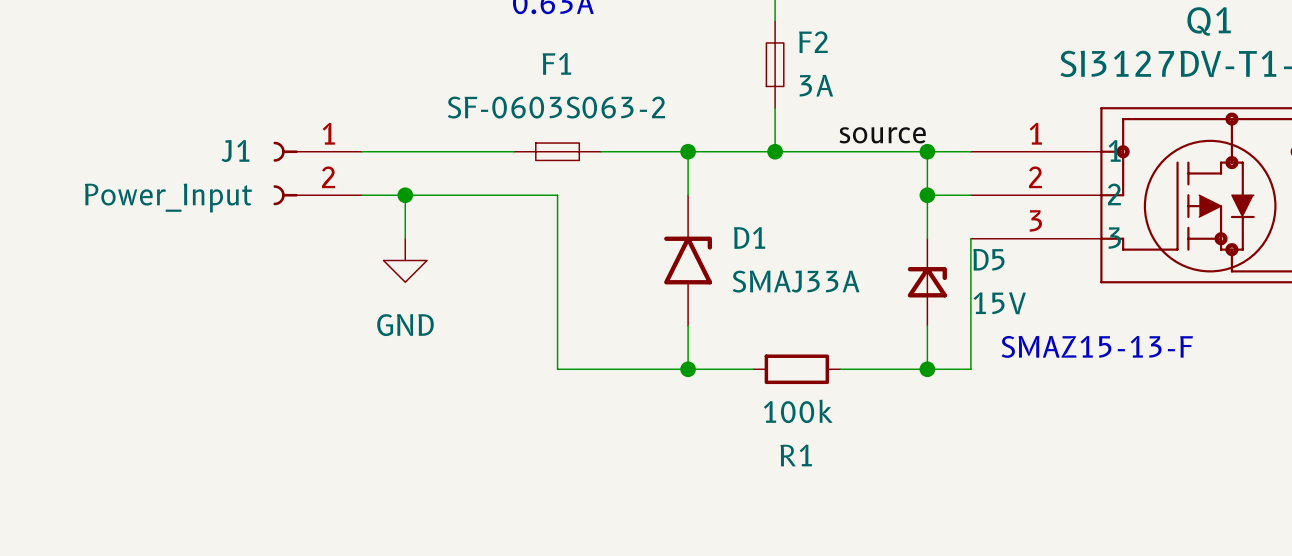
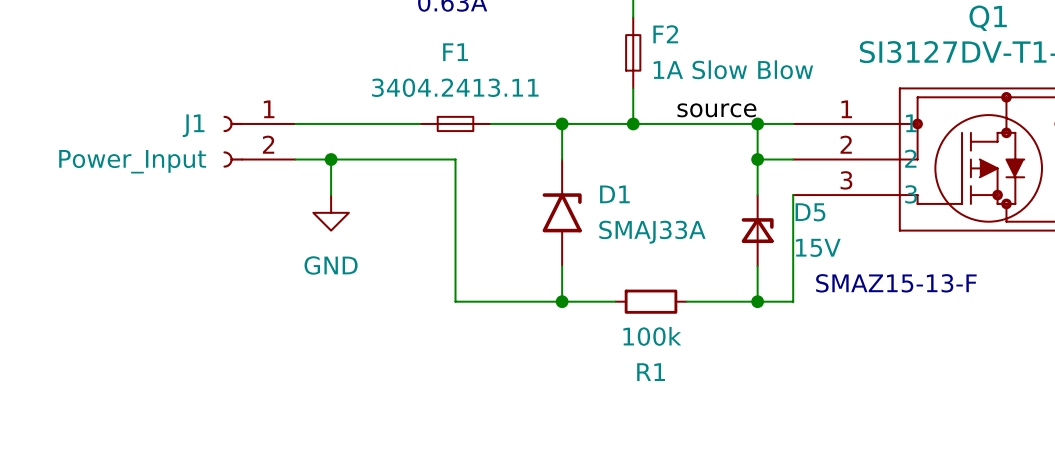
F2 value: 3A (816, 85) -> 1A Slow Blow (733, 69)
F1 value: SF-0603S063-2 (556, 107) -> 3404.2413.11 (455, 87)

